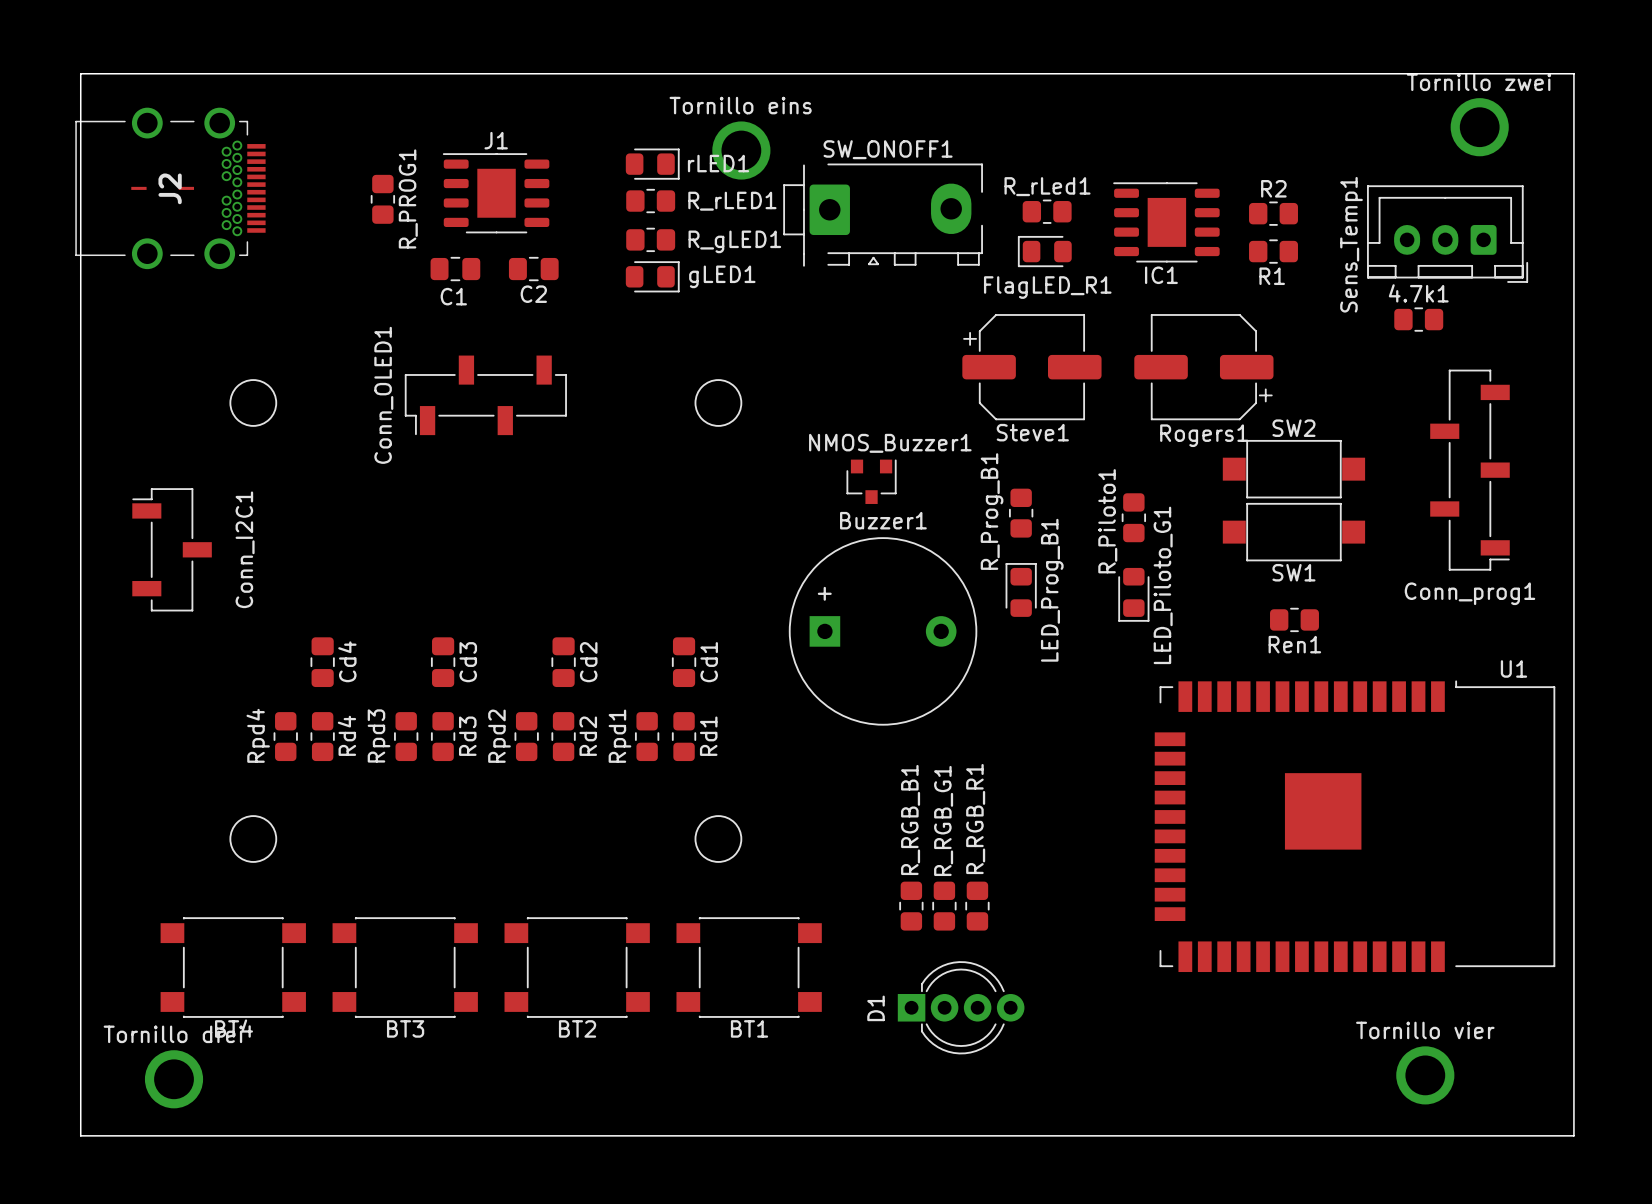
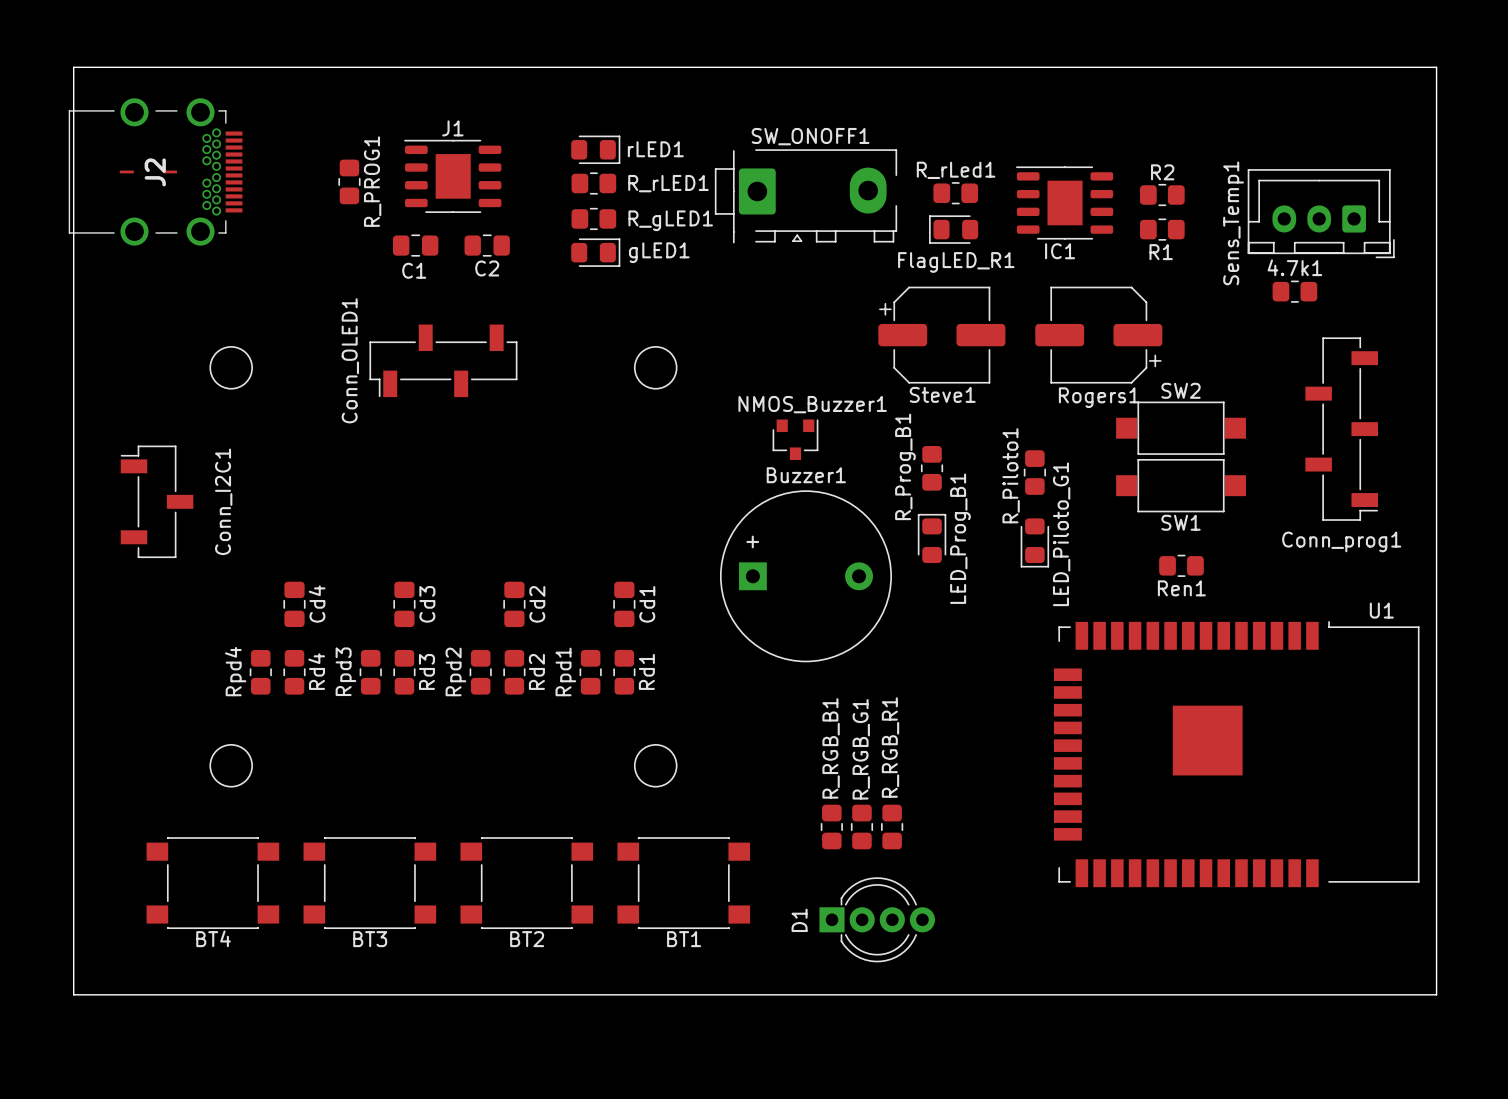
Tornillo zwei: (1479, 127) -> none
Tornillo eins: (741, 150) -> none
Tornillo vier: (1425, 1075) -> none
Tornillo drei: (174, 1079) -> none
board edge: (80, 1089) (80, 1135) (1573, 1135) (1573, 1089) -> (73, 994) (1436, 994)

